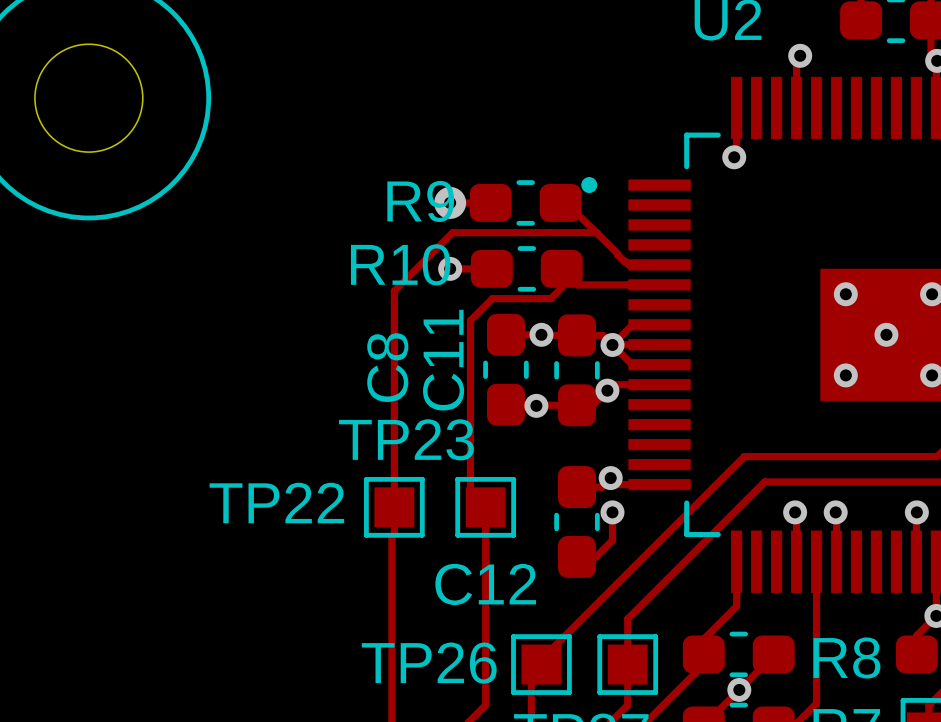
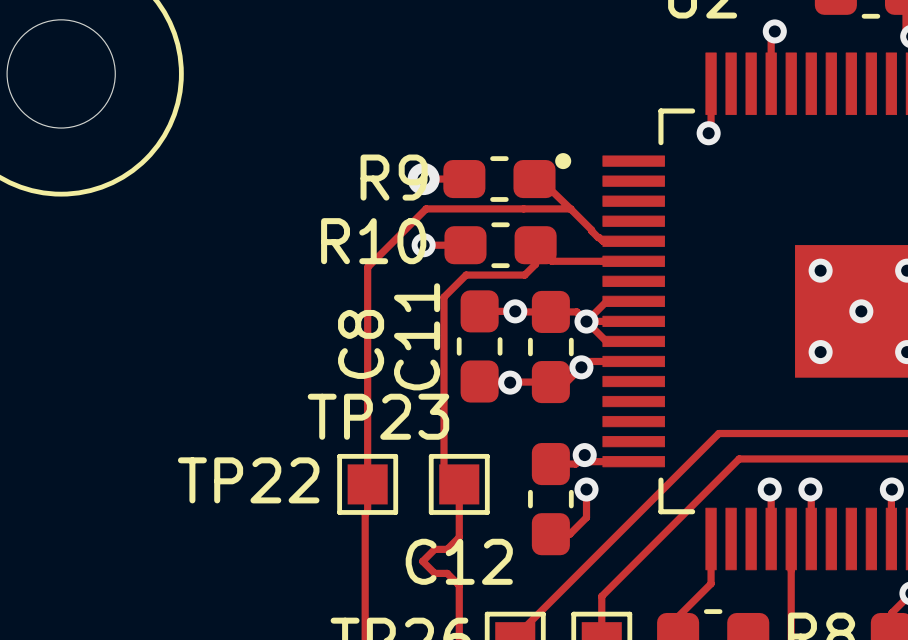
track: (485, 560) (485, 608) -> (459, 537) (447, 549) (434, 549) (422, 561) (434, 573) (447, 573) (459, 585)

